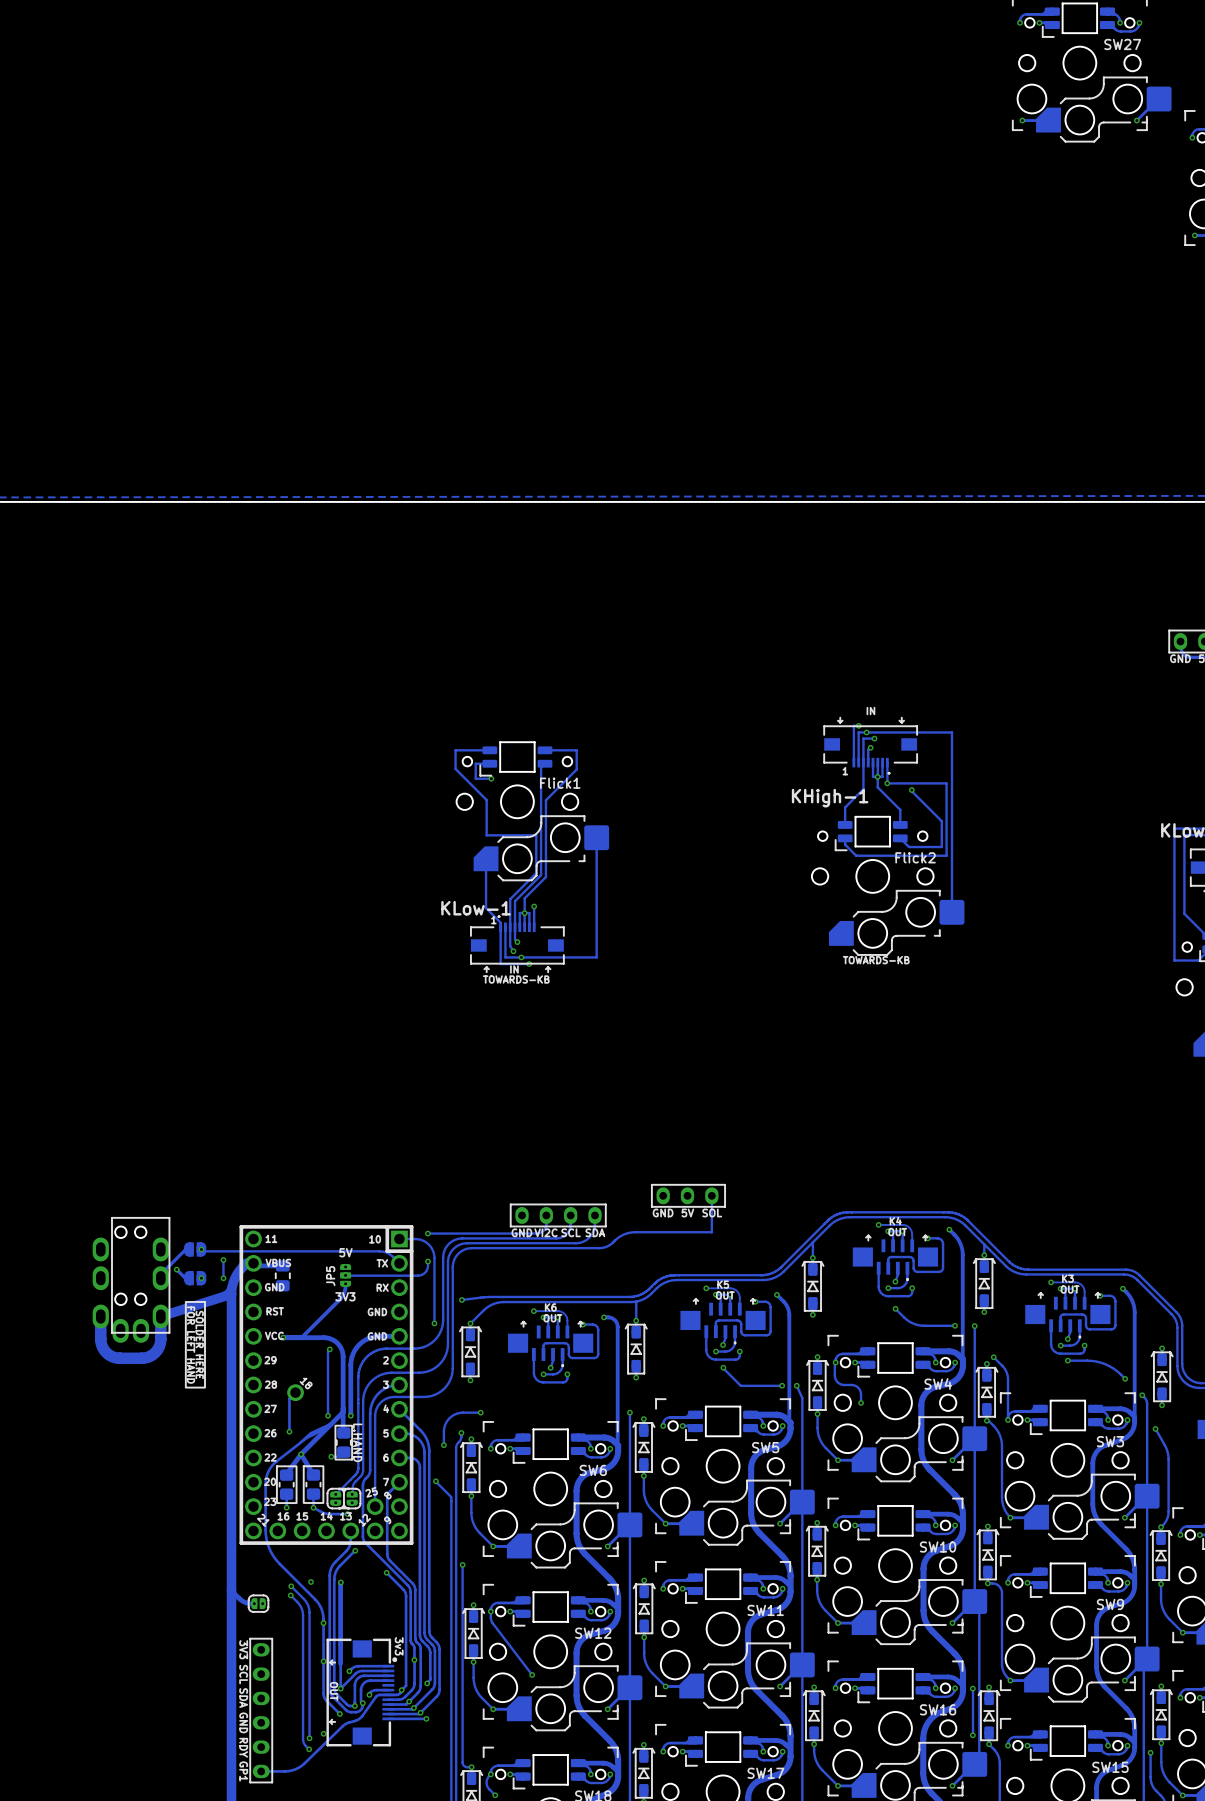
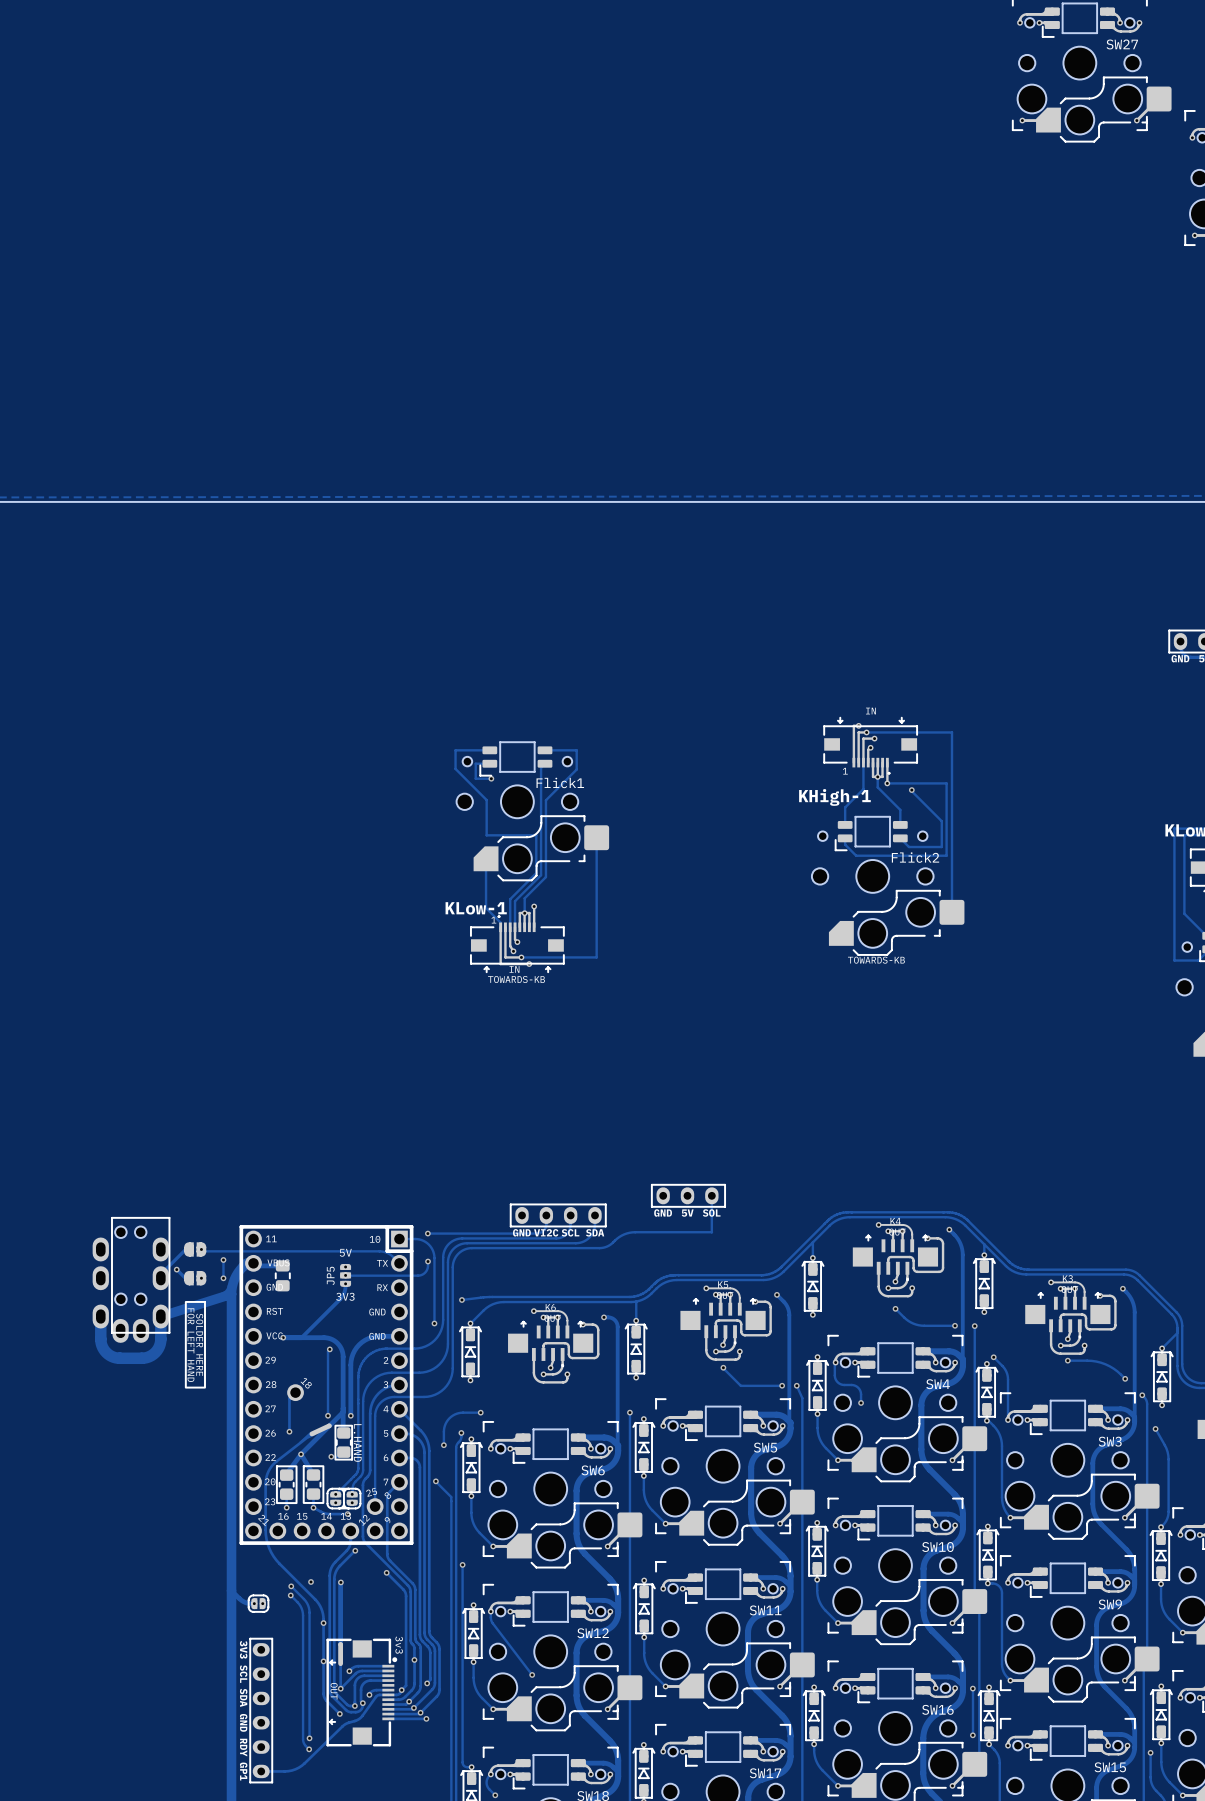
track: none -> (1177, 1333) (1162, 1348)
via: (323, 1733) -> none

